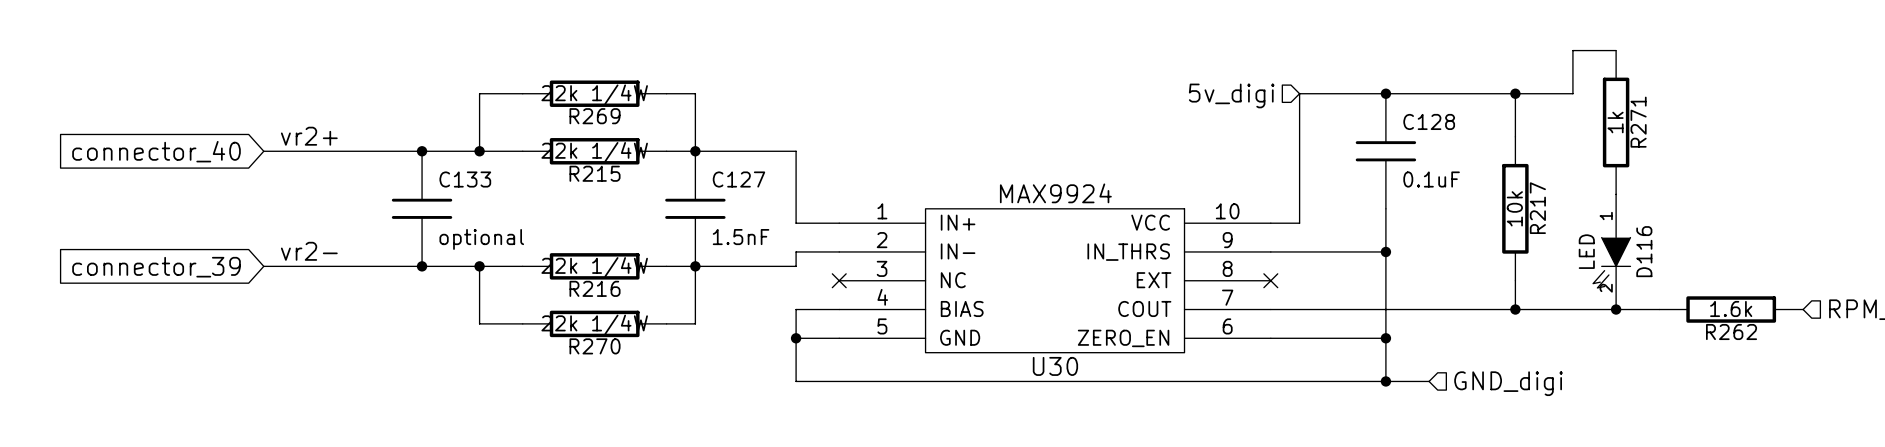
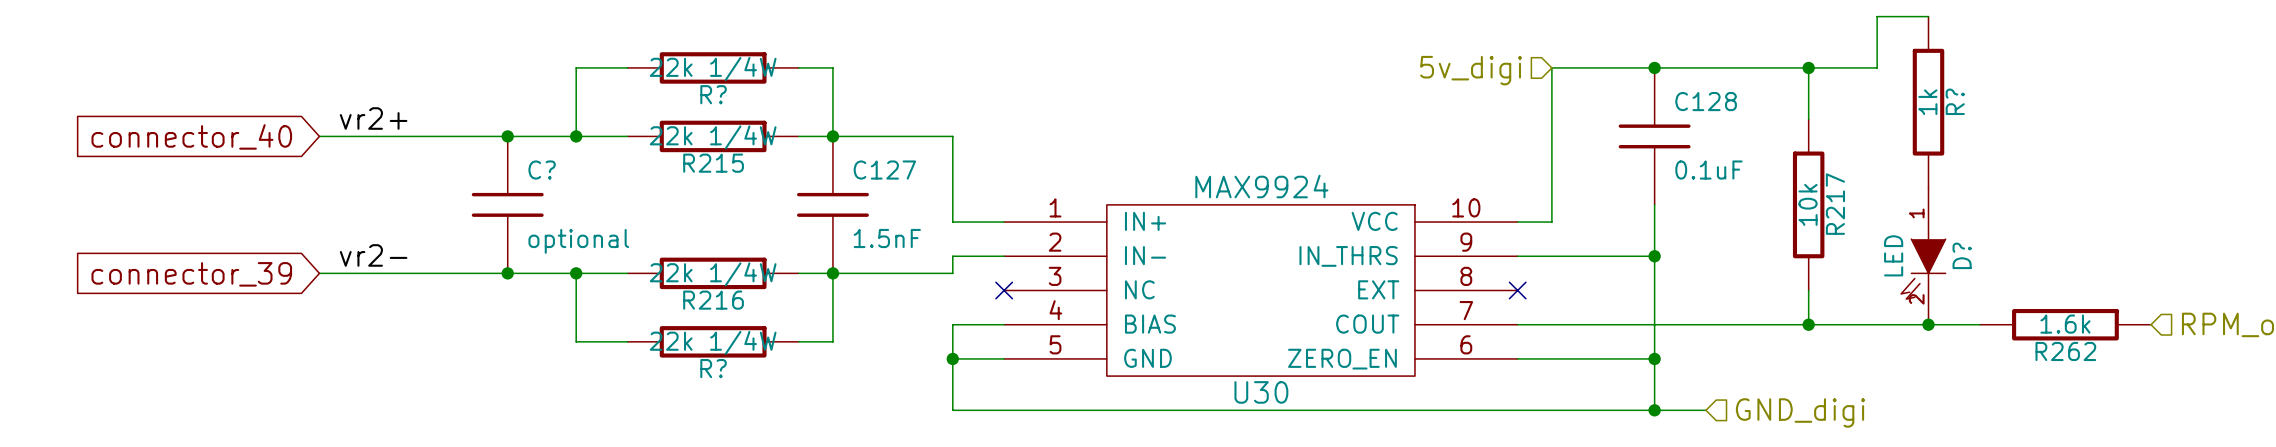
R269 name: R269 (595, 116) -> R? (713, 94)
R271 name: R271 (1638, 122) -> R? (1955, 101)
C133 name: C133 (465, 179) -> C? (542, 170)
D116 name: D116 (1644, 251) -> D? (1962, 255)
R270 name: R270 (595, 346) -> R? (713, 368)

